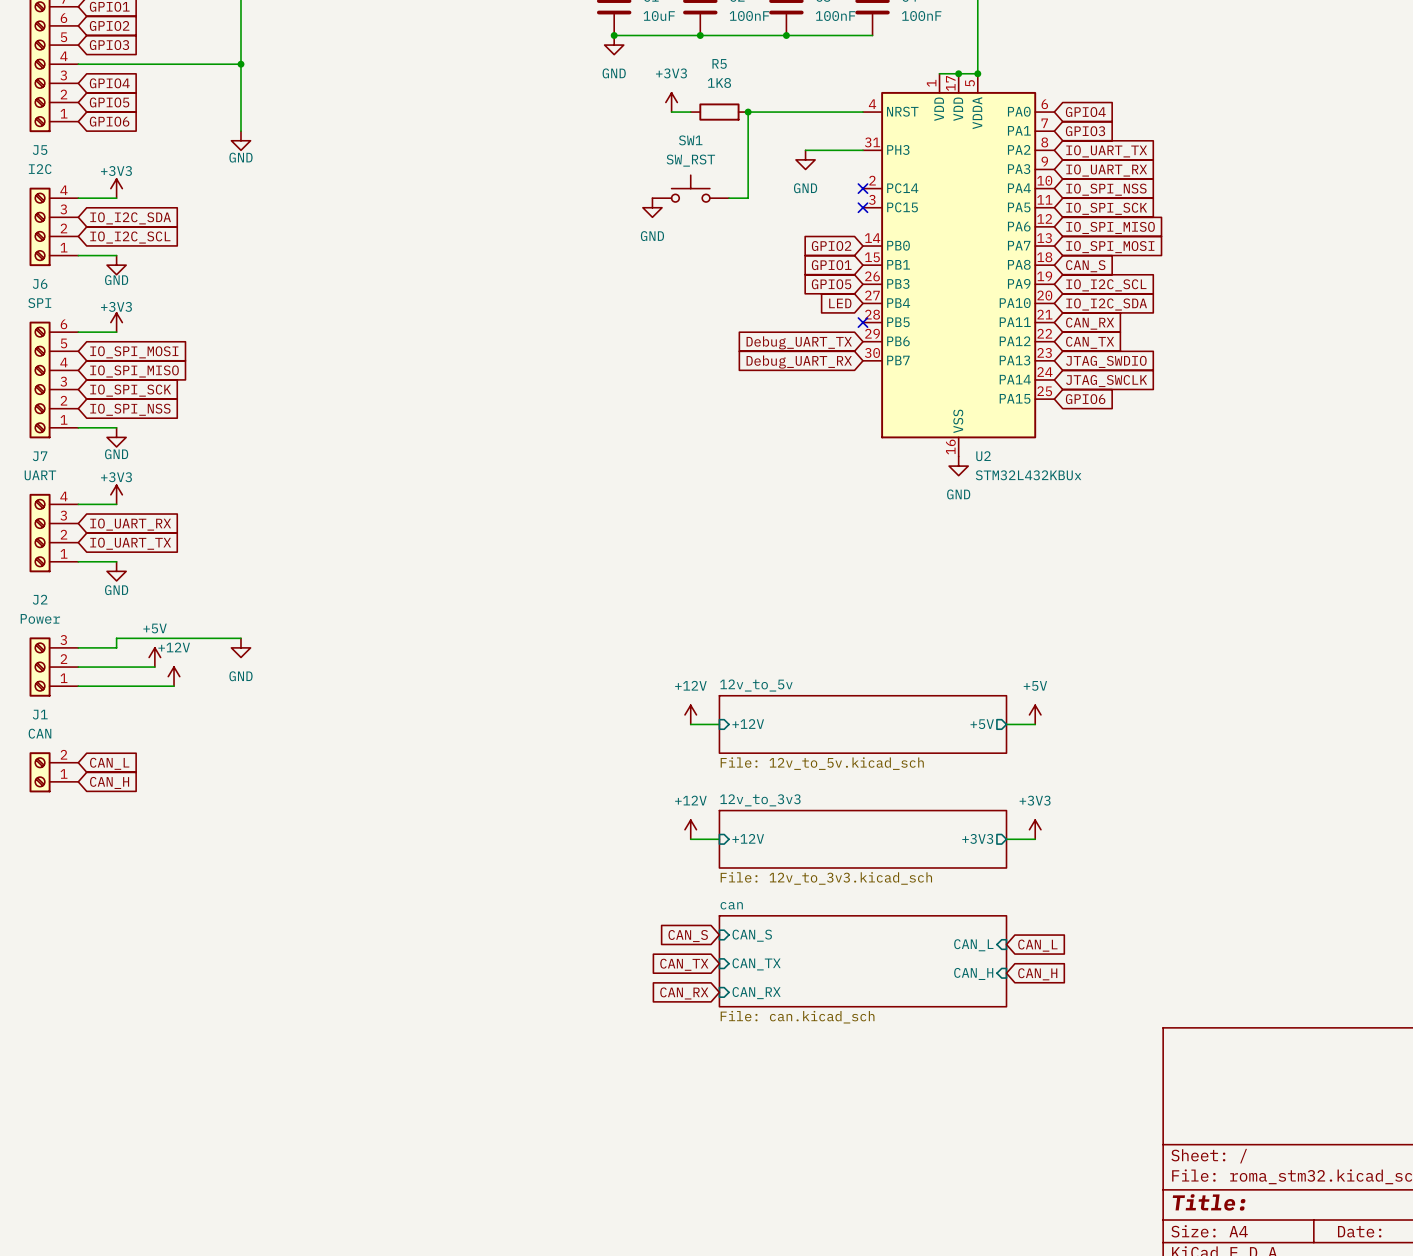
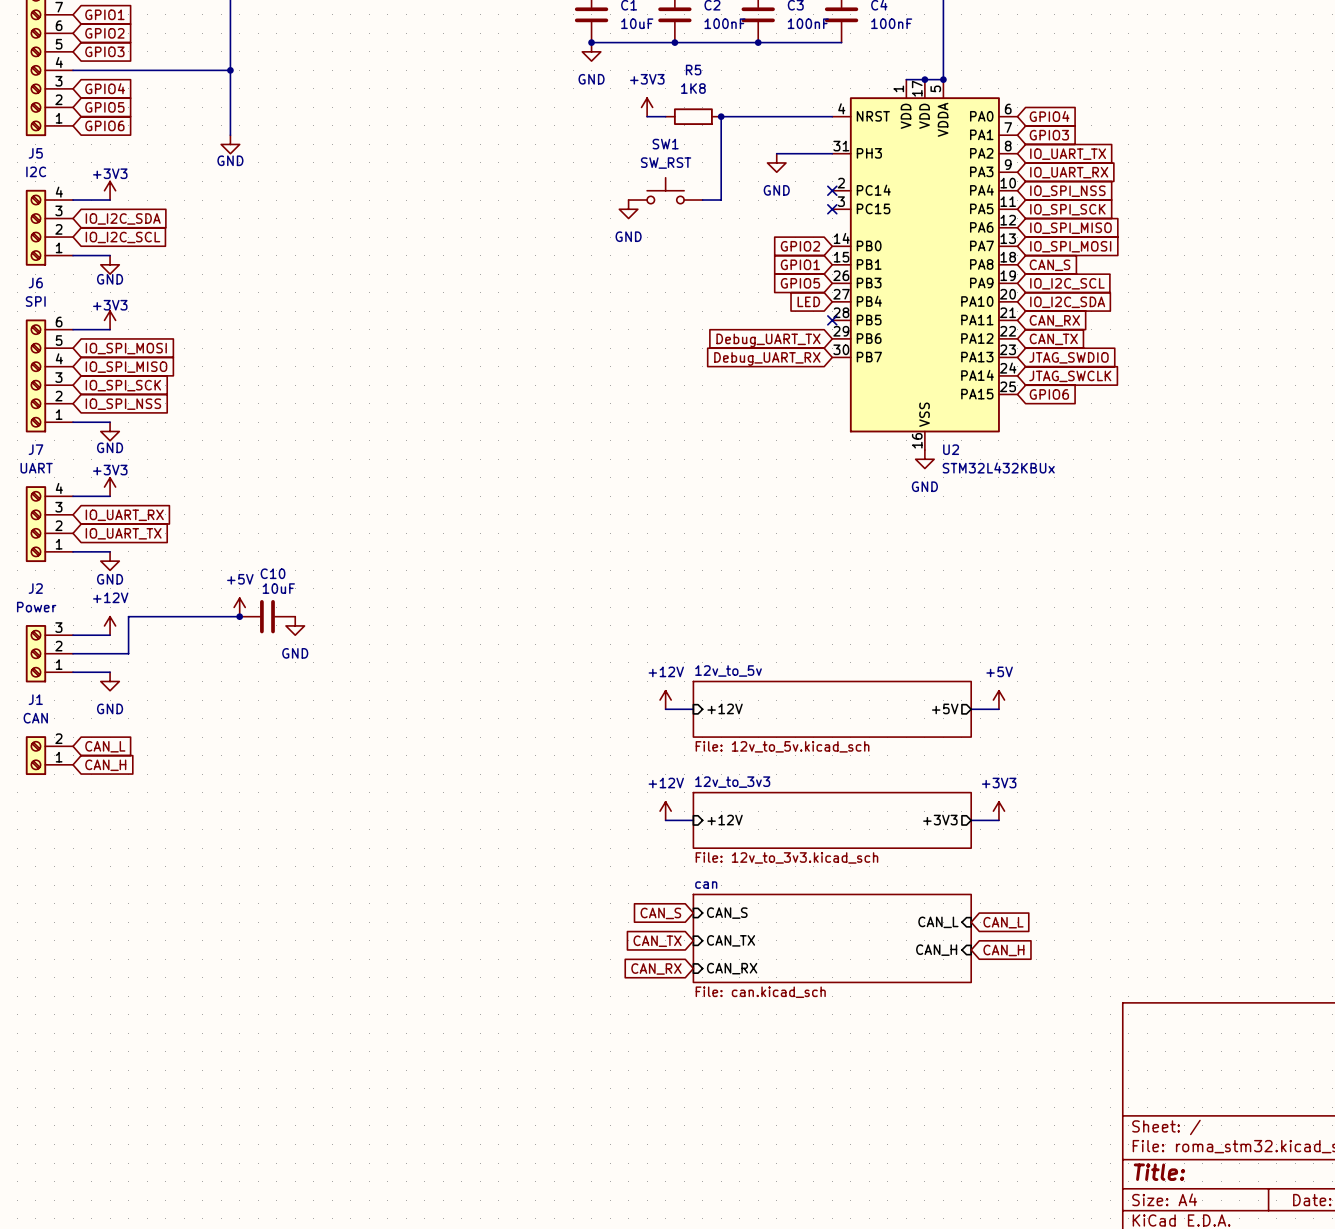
junction: none -> (239, 616)
C10: none -> 10uF (267, 616)
wire: (240, 638) (116, 638) (116, 647) -> none
power symbol: none -> GND (295, 625)
power symbol: GND (240, 647) -> none
power symbol position: +5V (154, 657) -> +5V (239, 607)
wire: (135, 667) (154, 667) -> (128, 653) (128, 616) (239, 616)
power symbol position: +12V (174, 676) -> +12V (110, 625)
wire: (116, 686) (174, 686) -> none
power symbol: none -> GND (110, 681)

